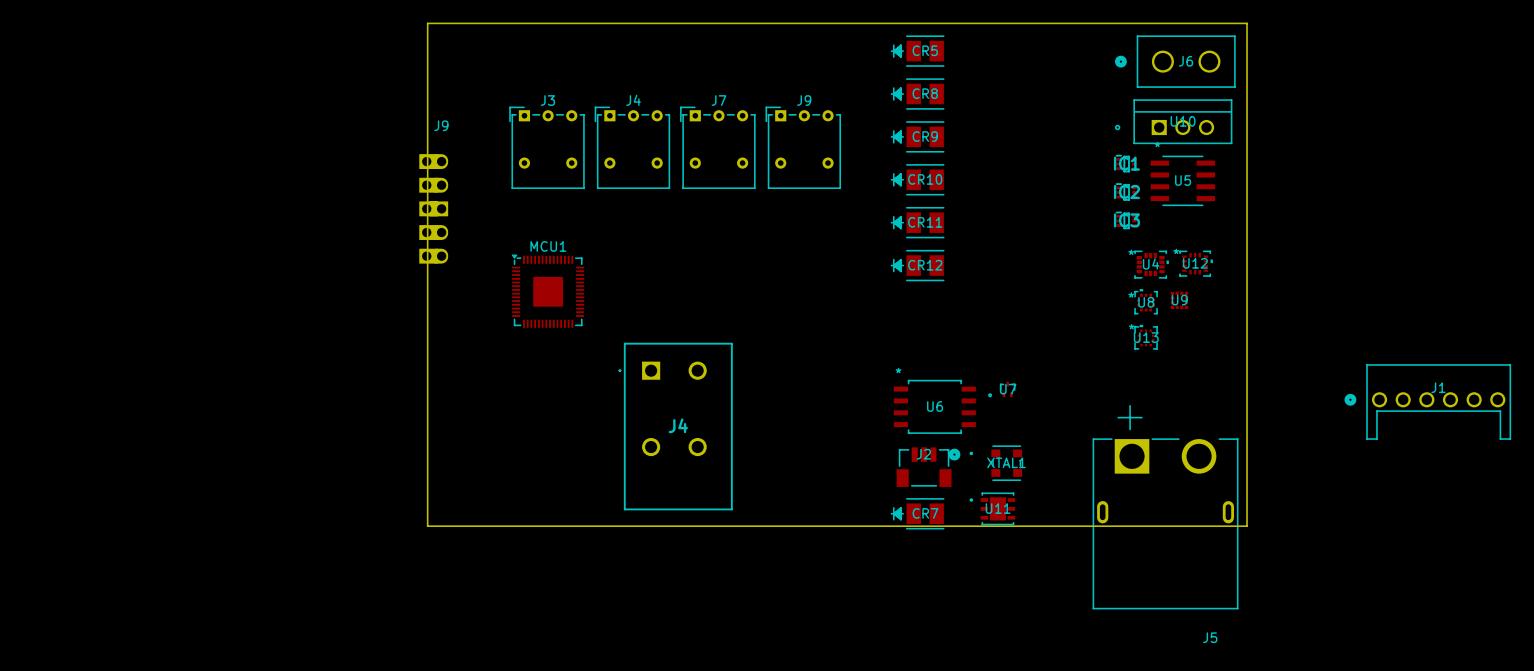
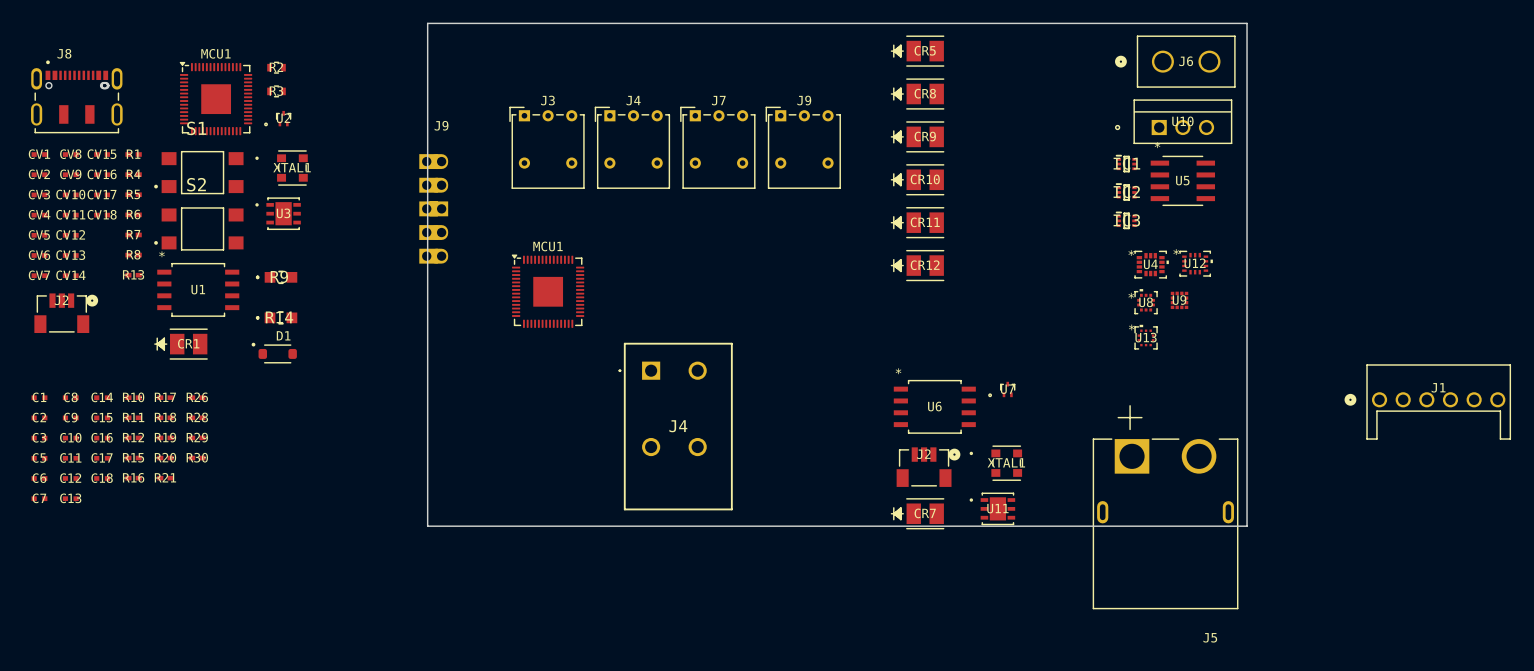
R2: none -> (276, 67)
R3: none -> (276, 91)
J8: none -> (76, 96)
MCU1: none -> (215, 98)
U2: none -> (277, 118)
CV1: none -> (39, 154)
CV8: none -> (70, 154)
CV15: none -> (102, 154)
R1: none -> (133, 154)
XTAL1: none -> (281, 168)
S1: none -> (198, 172)
CV2: none -> (39, 174)
CV9: none -> (70, 174)
CV16: none -> (102, 174)
R4: none -> (133, 174)
CV3: none -> (39, 194)
CV10: none -> (70, 194)
CV17: none -> (102, 194)
R5: none -> (133, 194)
U3: none -> (278, 213)
R6: none -> (133, 214)
CV4: none -> (39, 215)
CV11: none -> (70, 215)
CV18: none -> (102, 215)
S2: none -> (198, 228)
R7: none -> (133, 234)
CV5: none -> (39, 235)
CV12: none -> (70, 235)
CV6: none -> (39, 255)
CV13: none -> (70, 255)
R8: none -> (133, 255)
CV7: none -> (39, 275)
CV14: none -> (70, 275)
R13: none -> (133, 275)
R9: none -> (276, 277)
U1: none -> (198, 289)
J2: none -> (66, 313)
R14: none -> (276, 317)
CR1: none -> (181, 344)
D1: none -> (274, 353)
C1: none -> (39, 397)
C8: none -> (70, 397)
C14: none -> (102, 397)
R10: none -> (133, 397)
R17: none -> (165, 397)
R26: none -> (197, 397)
C2: none -> (39, 417)
C9: none -> (70, 417)
C15: none -> (102, 417)
R11: none -> (133, 417)
R18: none -> (165, 417)
R28: none -> (197, 417)
R12: none -> (133, 437)
R19: none -> (165, 437)
R29: none -> (197, 437)
C3: none -> (39, 438)
C10: none -> (70, 438)
C16: none -> (102, 438)
C5: none -> (39, 458)
C11: none -> (70, 458)
C17: none -> (102, 458)
R15: none -> (133, 458)
R20: none -> (165, 458)
R30: none -> (197, 458)
C6: none -> (39, 478)
C12: none -> (70, 478)
C18: none -> (102, 478)
R16: none -> (133, 478)
R21: none -> (165, 478)
C7: none -> (39, 498)
C13: none -> (70, 498)

